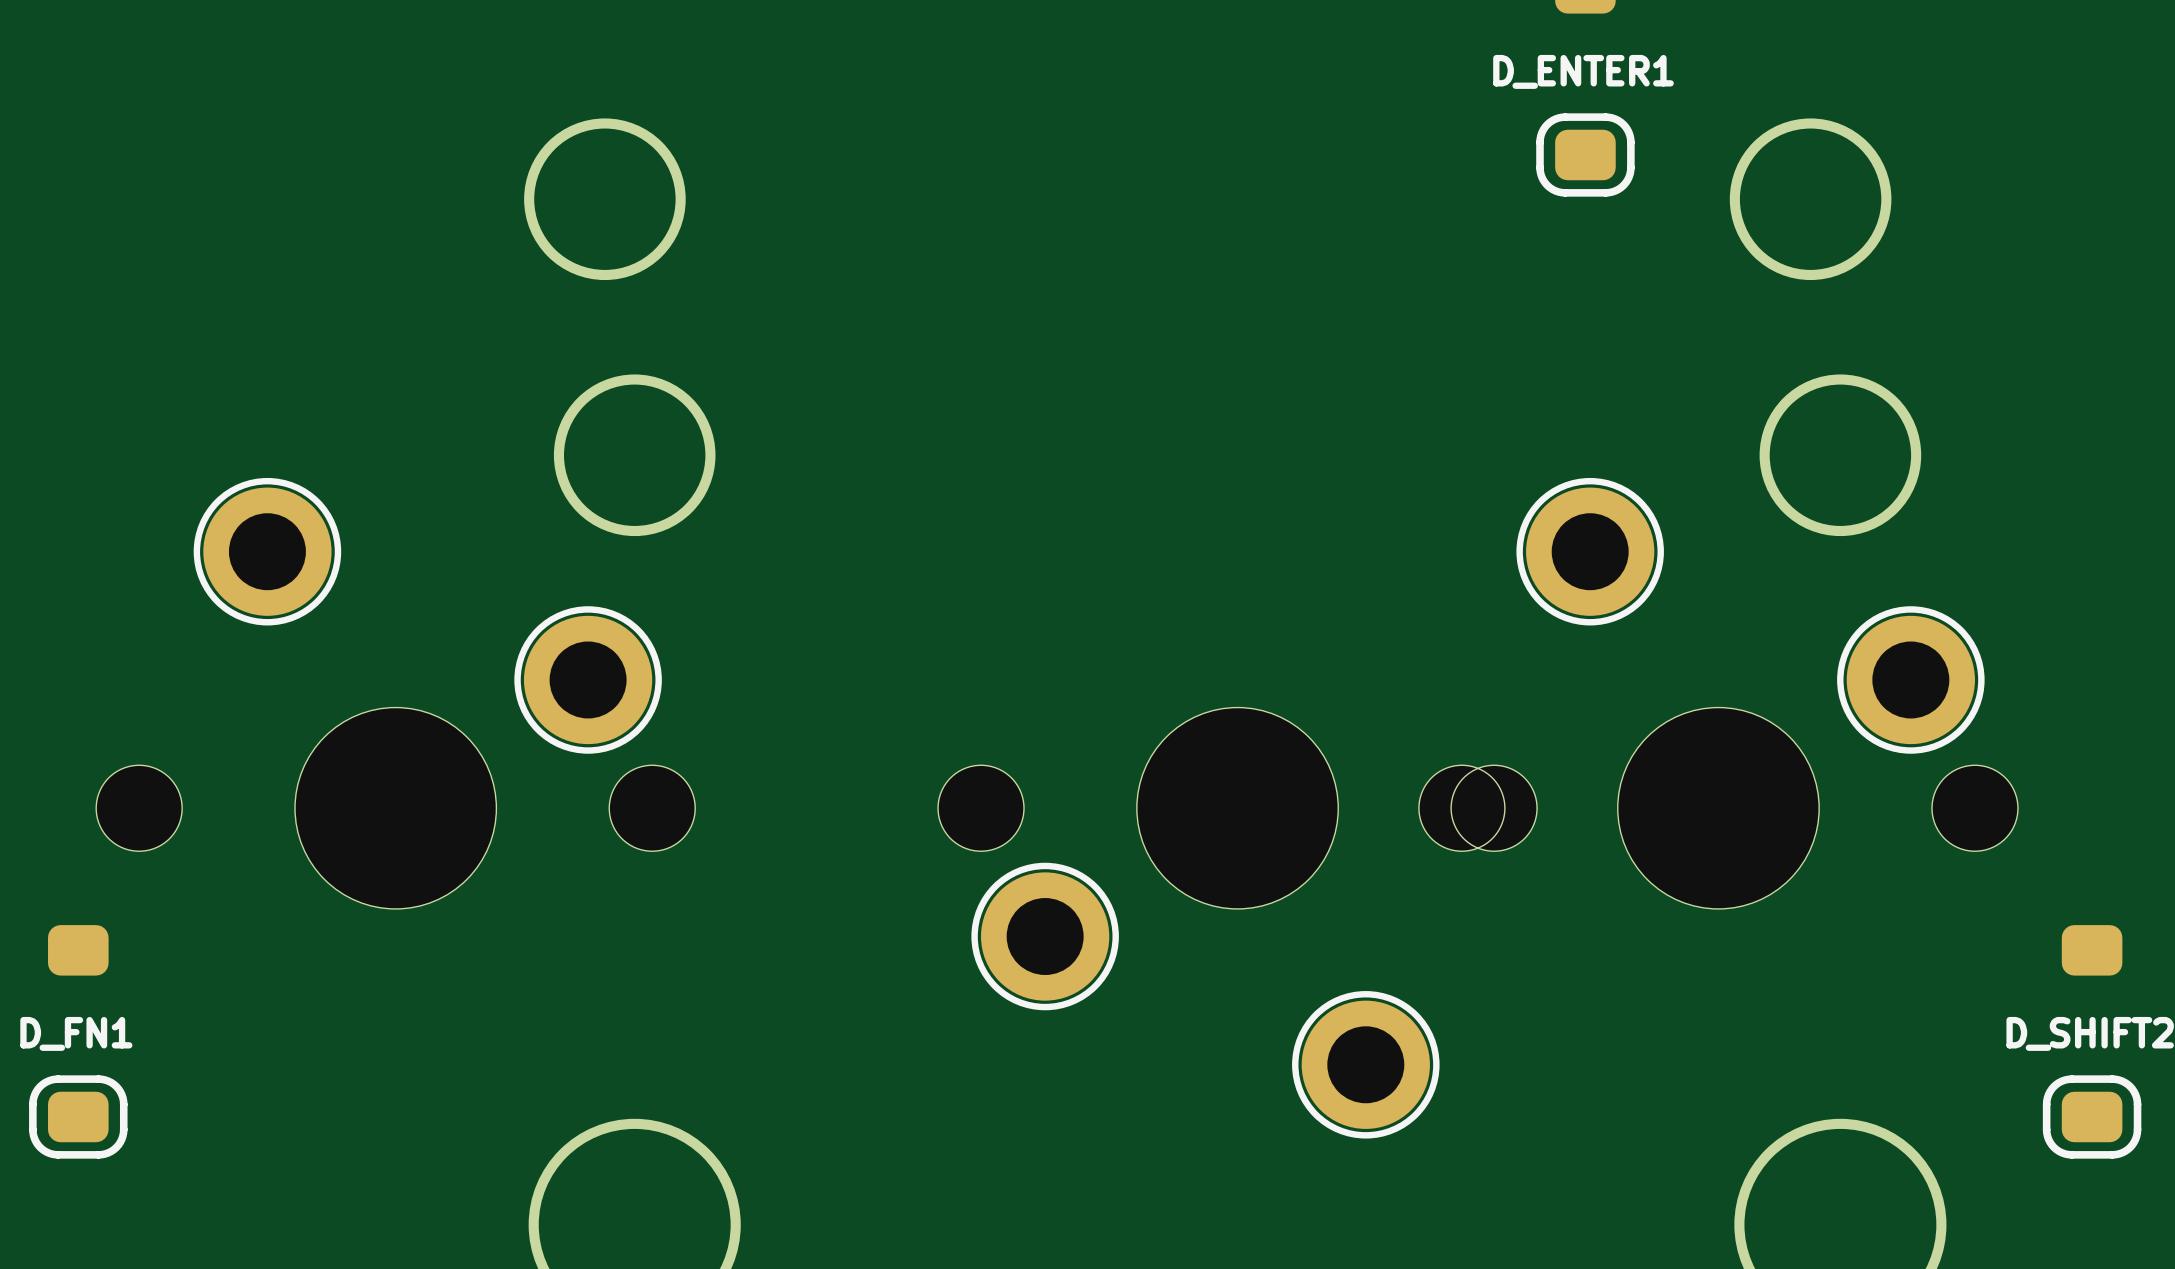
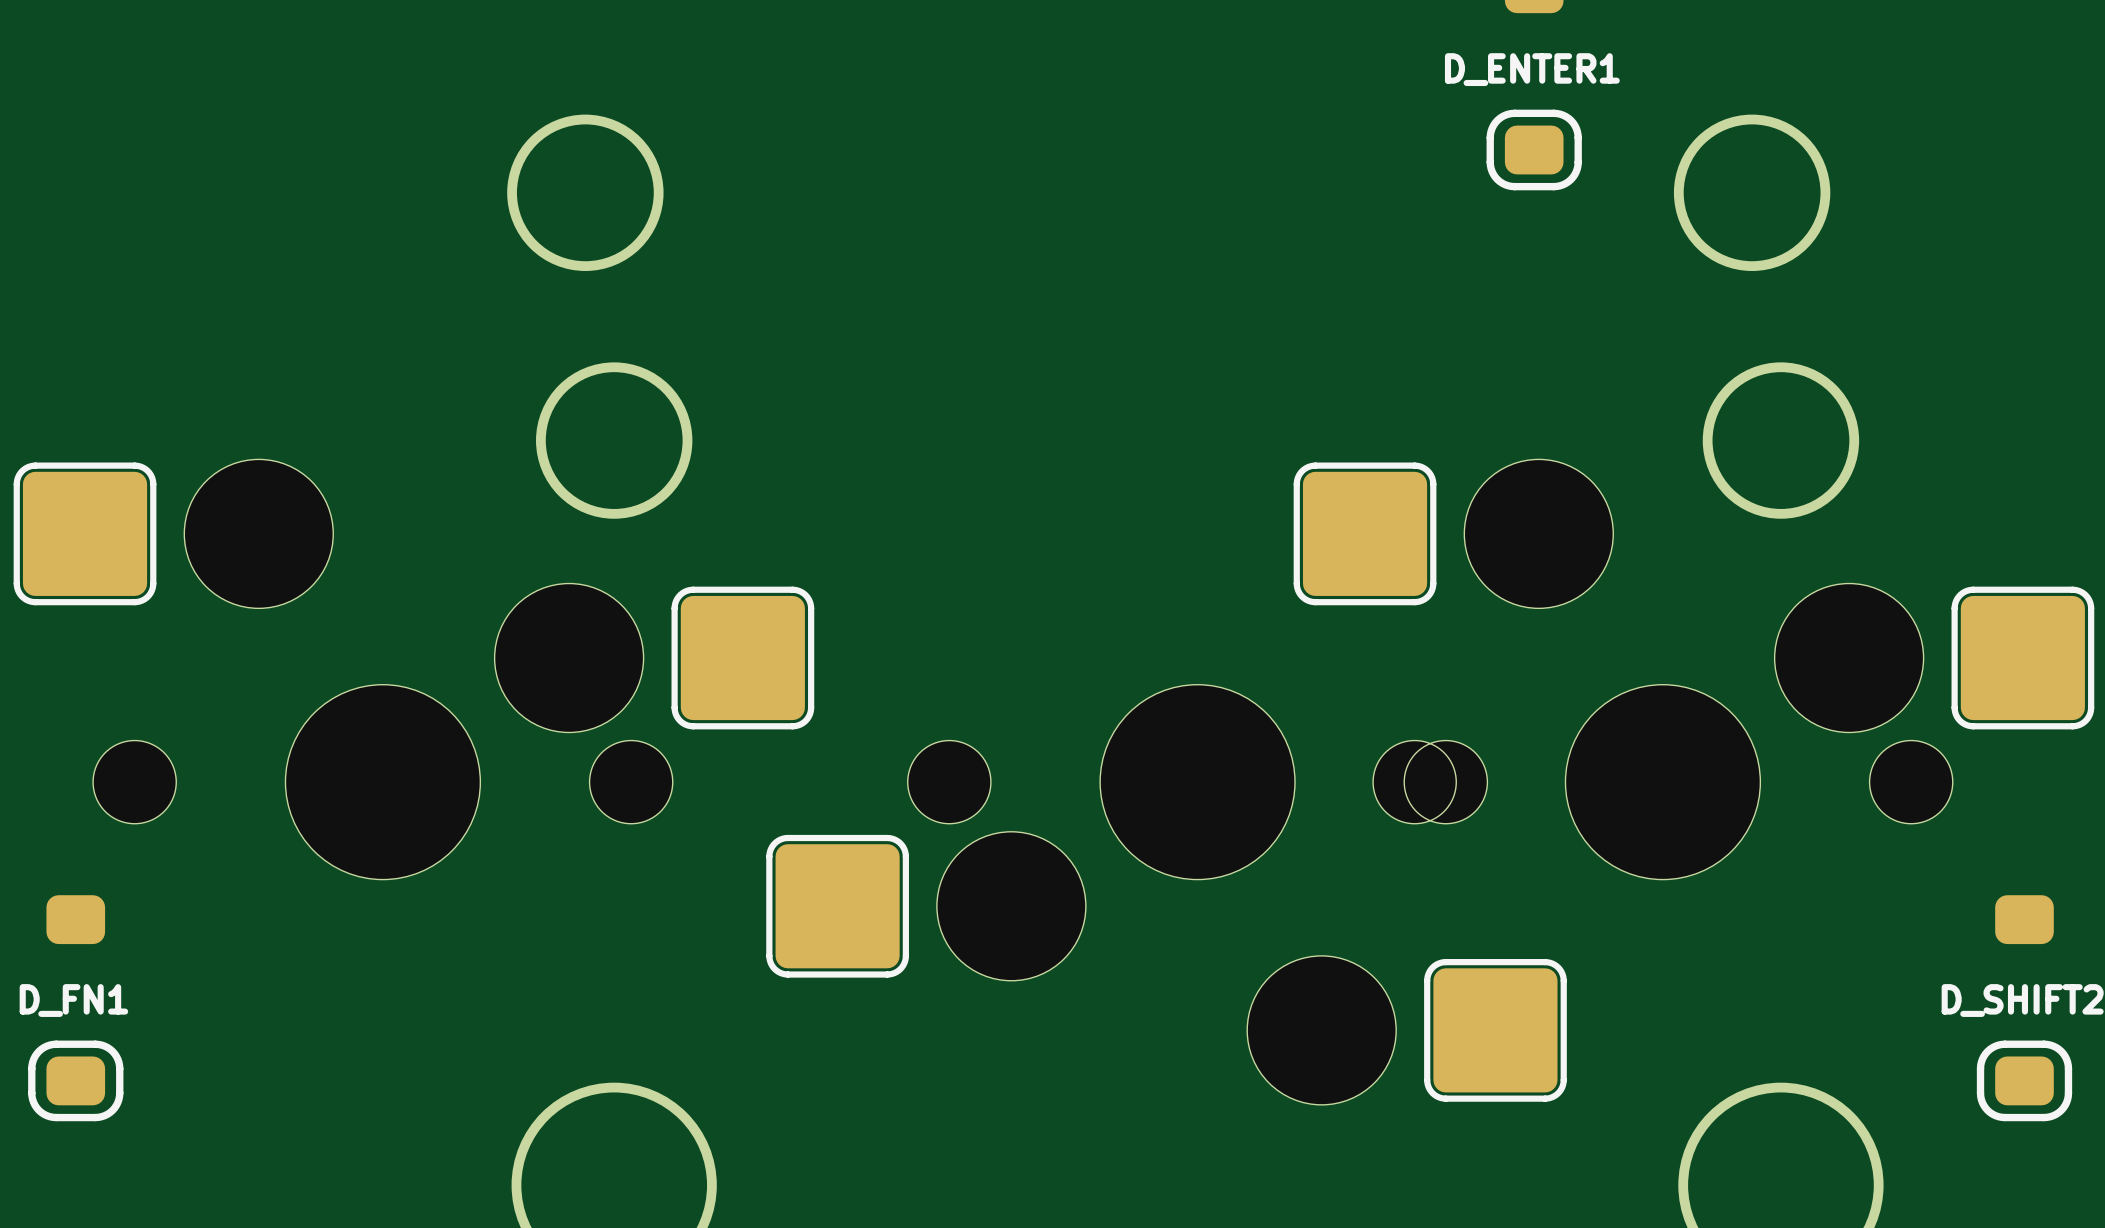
part footprint: [96, 477, 696, 909] -> [13, 459, 815, 880]
part footprint: [1418, 477, 2018, 909] -> [1293, 459, 2095, 880]
part footprint: [938, 707, 1538, 1139] -> [766, 684, 1567, 1105]

